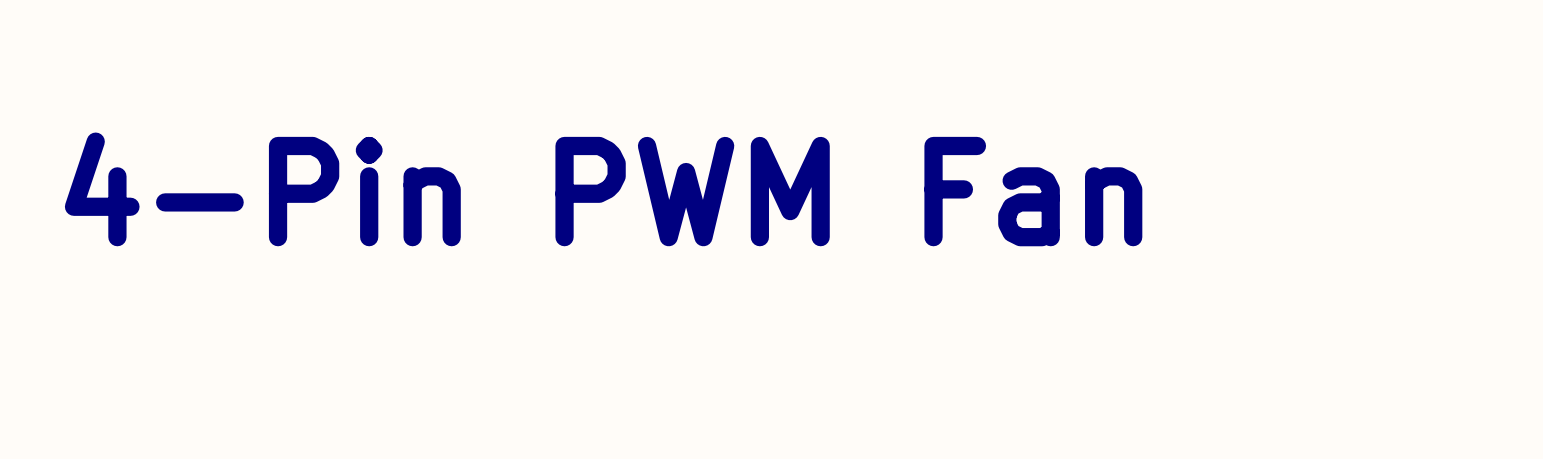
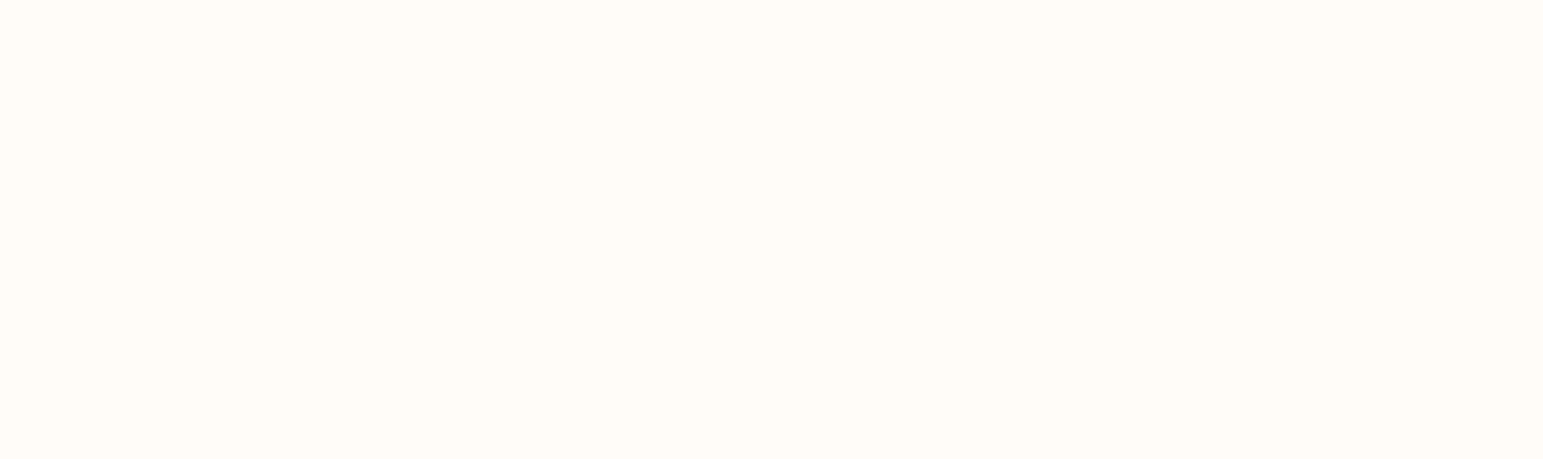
text: 4-Pin PWM Fan (603, 189) -> none

